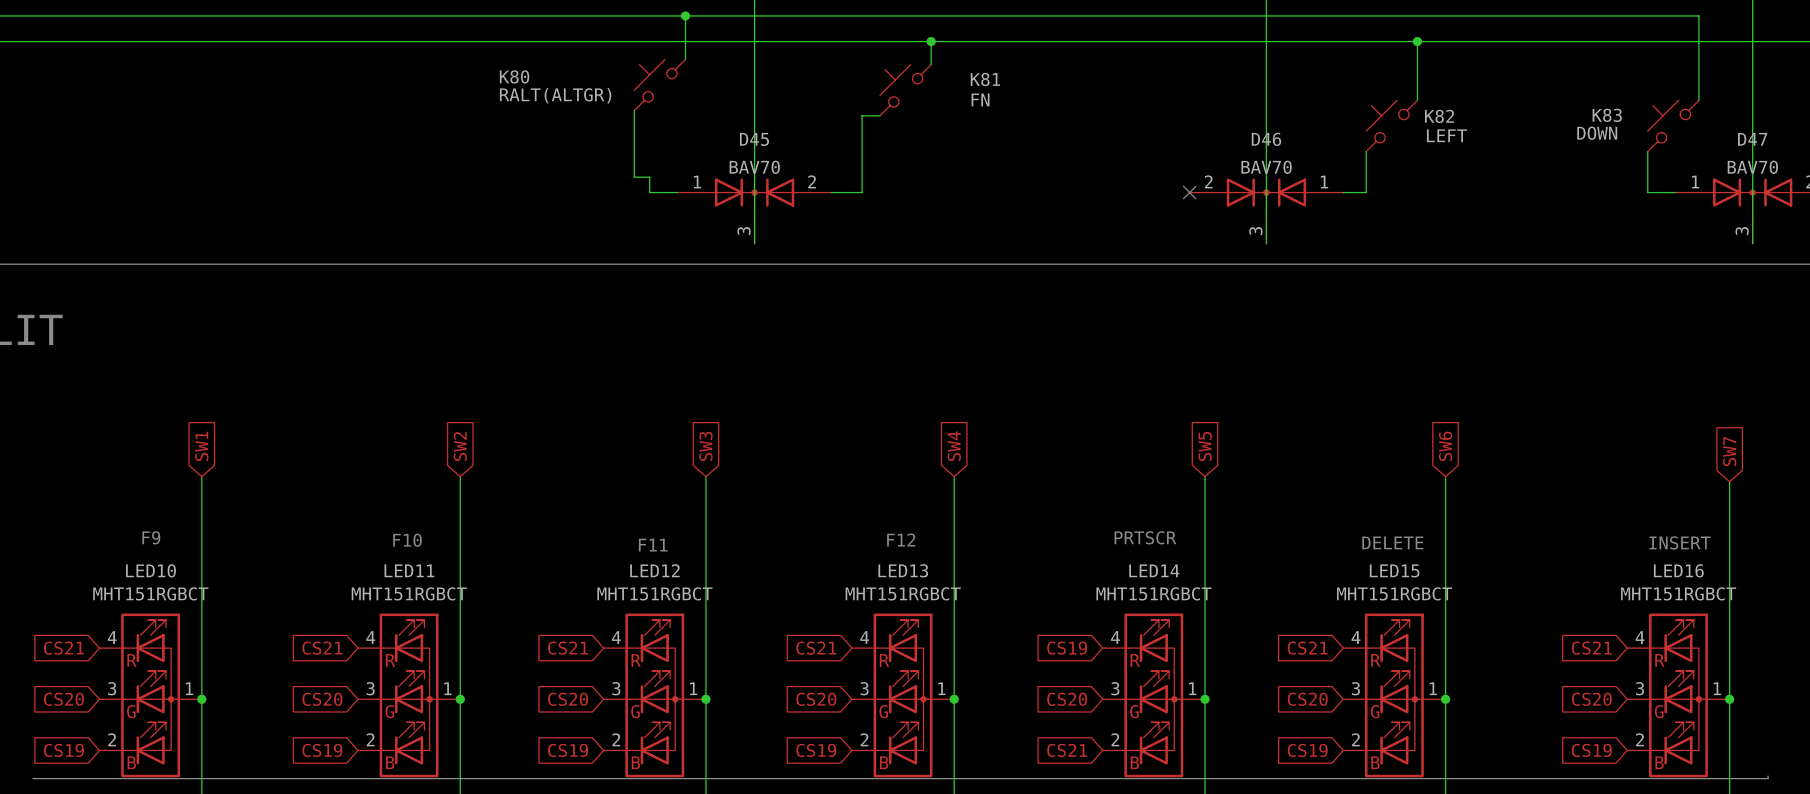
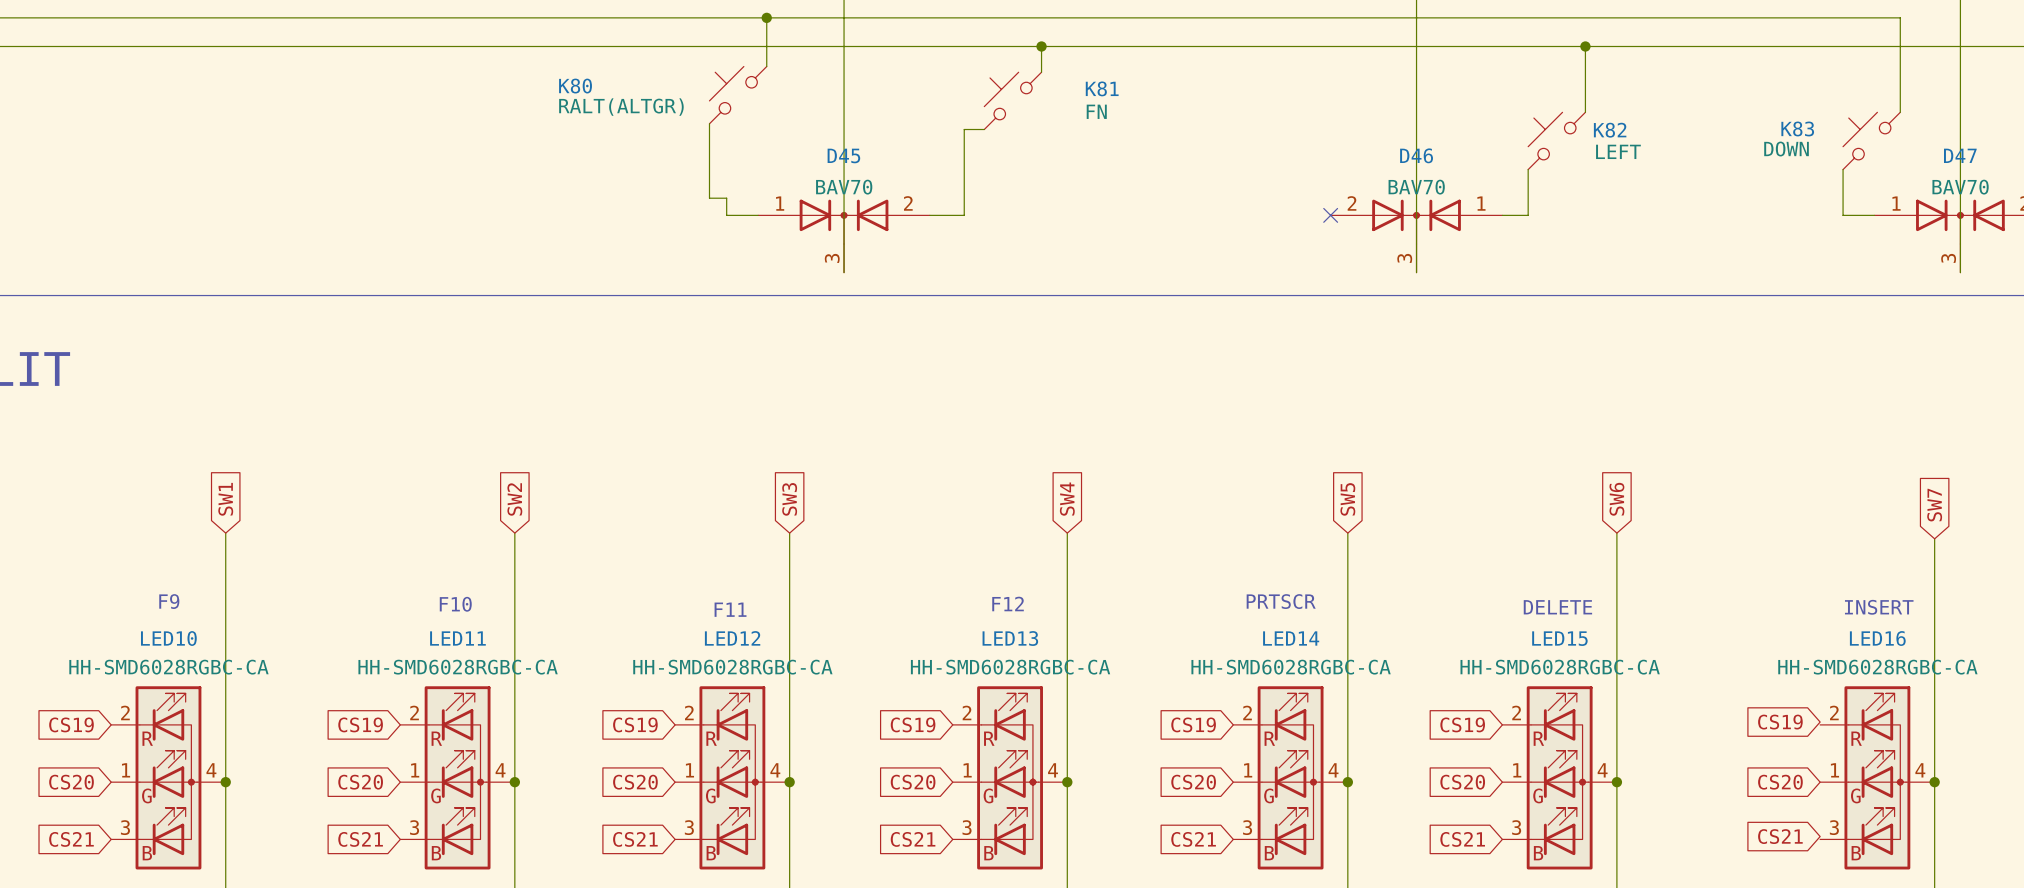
LED10 value: MHT151RGBCT (150, 593) -> HH-SMD6028RGBC-CA (168, 667)
LED11 value: MHT151RGBCT (409, 593) -> HH-SMD6028RGBC-CA (458, 667)
LED12 value: MHT151RGBCT (654, 593) -> HH-SMD6028RGBC-CA (732, 667)
LED13 value: MHT151RGBCT (903, 593) -> HH-SMD6028RGBC-CA (1010, 667)
LED14 value: MHT151RGBCT (1153, 593) -> HH-SMD6028RGBC-CA (1291, 667)
LED15 value: MHT151RGBCT (1394, 593) -> HH-SMD6028RGBC-CA (1560, 667)
LED16 value: MHT151RGBCT (1678, 593) -> HH-SMD6028RGBC-CA (1877, 667)
LED10 pin number: 4 (112, 637) -> 2 (125, 712)
LED11 pin number: 4 (370, 637) -> 2 (414, 712)
LED12 pin number: 4 (616, 637) -> 2 (689, 712)
LED13 pin number: 4 (864, 637) -> 2 (967, 712)
LED14 pin number: 4 (1115, 637) -> 2 (1247, 712)
LED15 pin number: 4 (1356, 637) -> 2 (1516, 712)
LED16 pin number: 4 (1640, 637) -> 2 (1834, 712)
global label: CS21 (63, 648) -> CS19 (71, 724)
global label: CS21 (322, 648) -> CS19 (360, 724)
global label: CS21 (568, 648) -> CS19 (635, 724)
global label: CS21 (816, 648) -> CS19 (913, 724)
global label: CS21 (1307, 648) -> CS19 (1462, 724)
global label position: CS21 (1591, 648) -> CS21 (1780, 836)
LED10 pin number: 3 (112, 688) -> 1 (126, 770)
LED10 pin number: 1 (189, 688) -> 4 (211, 770)
LED11 pin number: 3 (370, 688) -> 1 (415, 770)
LED11 pin number: 1 (447, 688) -> 4 (500, 770)
LED12 pin number: 3 (616, 688) -> 1 (689, 770)
LED12 pin number: 1 (693, 688) -> 4 (775, 770)
LED13 pin number: 3 (864, 688) -> 1 (967, 770)
LED13 pin number: 1 (941, 688) -> 4 (1053, 770)
LED14 pin number: 3 (1115, 688) -> 1 (1248, 770)
LED14 pin number: 1 (1192, 688) -> 4 (1333, 770)
LED15 pin number: 3 (1355, 688) -> 1 (1517, 770)
LED15 pin number: 1 (1433, 688) -> 4 (1602, 770)
LED16 pin number: 3 (1640, 688) -> 1 (1834, 770)
LED16 pin number: 1 (1717, 688) -> 4 (1920, 770)
LED10 pin number: 2 (112, 739) -> 3 (125, 827)
LED11 pin number: 2 (370, 739) -> 3 (414, 827)
LED12 pin number: 2 (616, 739) -> 3 (689, 827)
LED13 pin number: 2 (864, 739) -> 3 (967, 827)
LED14 pin number: 2 (1115, 739) -> 3 (1247, 827)
LED15 pin number: 2 (1355, 739) -> 3 (1516, 827)
LED16 pin number: 2 (1639, 739) -> 3 (1834, 827)
global label: CS19 (63, 750) -> CS21 (71, 839)
global label: CS19 (322, 750) -> CS21 (360, 839)
global label: CS19 (568, 750) -> CS21 (635, 839)
global label: CS19 (816, 750) -> CS21 (913, 839)
global label: CS19 (1307, 750) -> CS21 (1462, 839)
global label position: CS19 (1591, 750) -> CS19 (1780, 722)
line: (1768, 776) (1768, 778) (32, 778) -> none

